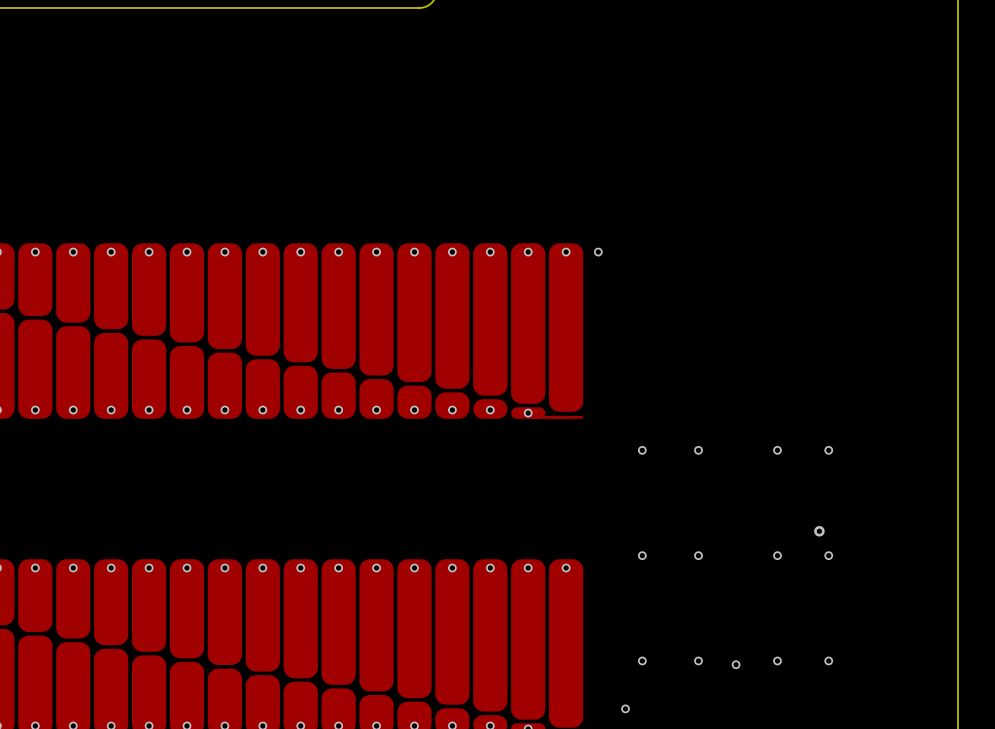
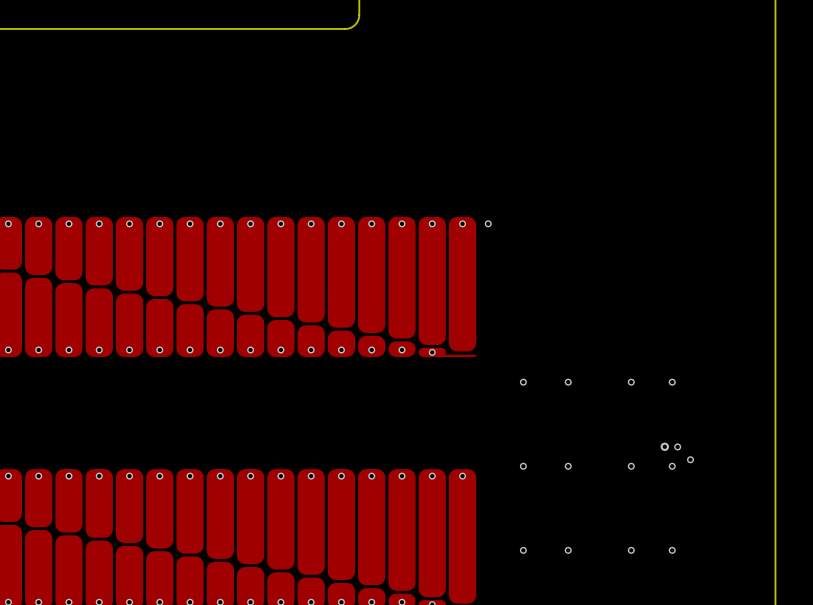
via: none -> (677, 446)
via: none -> (690, 459)
via: (736, 664) -> none
via: (625, 708) -> none

